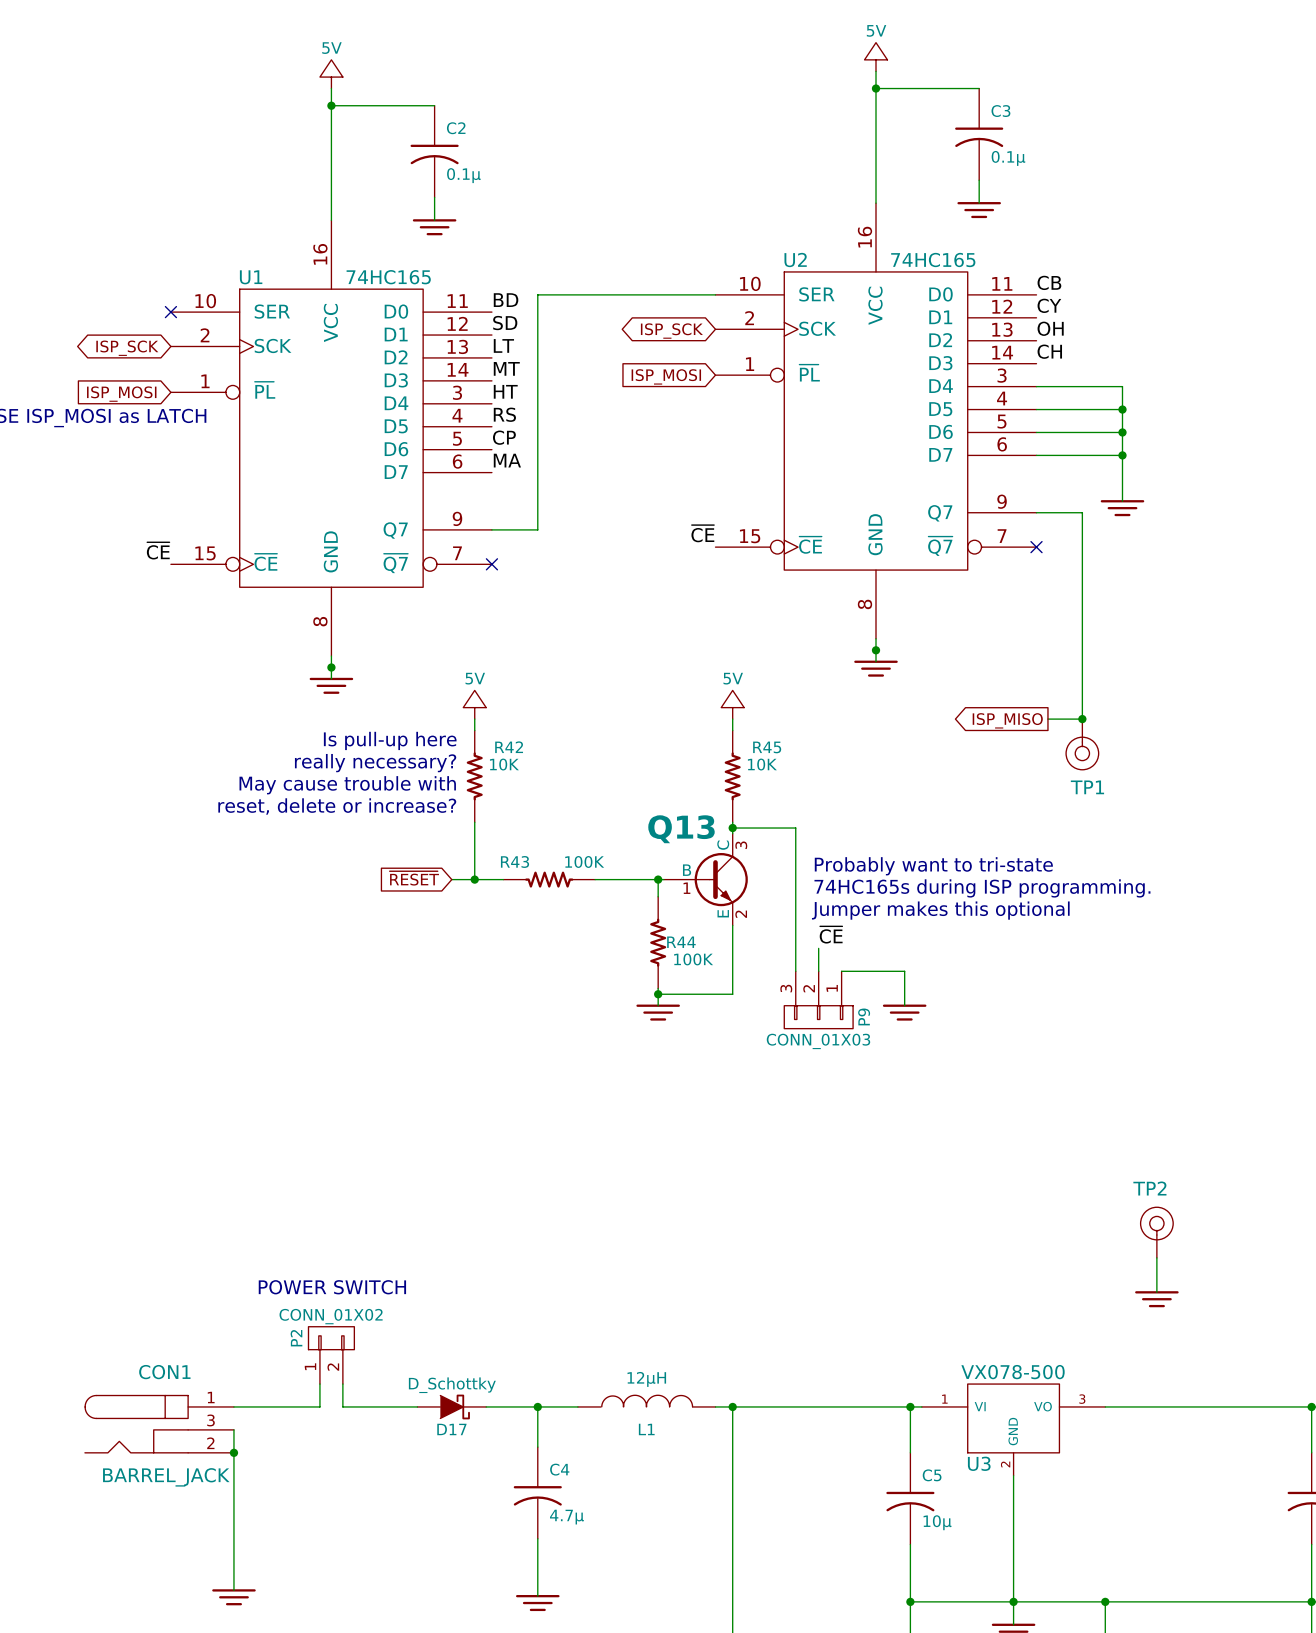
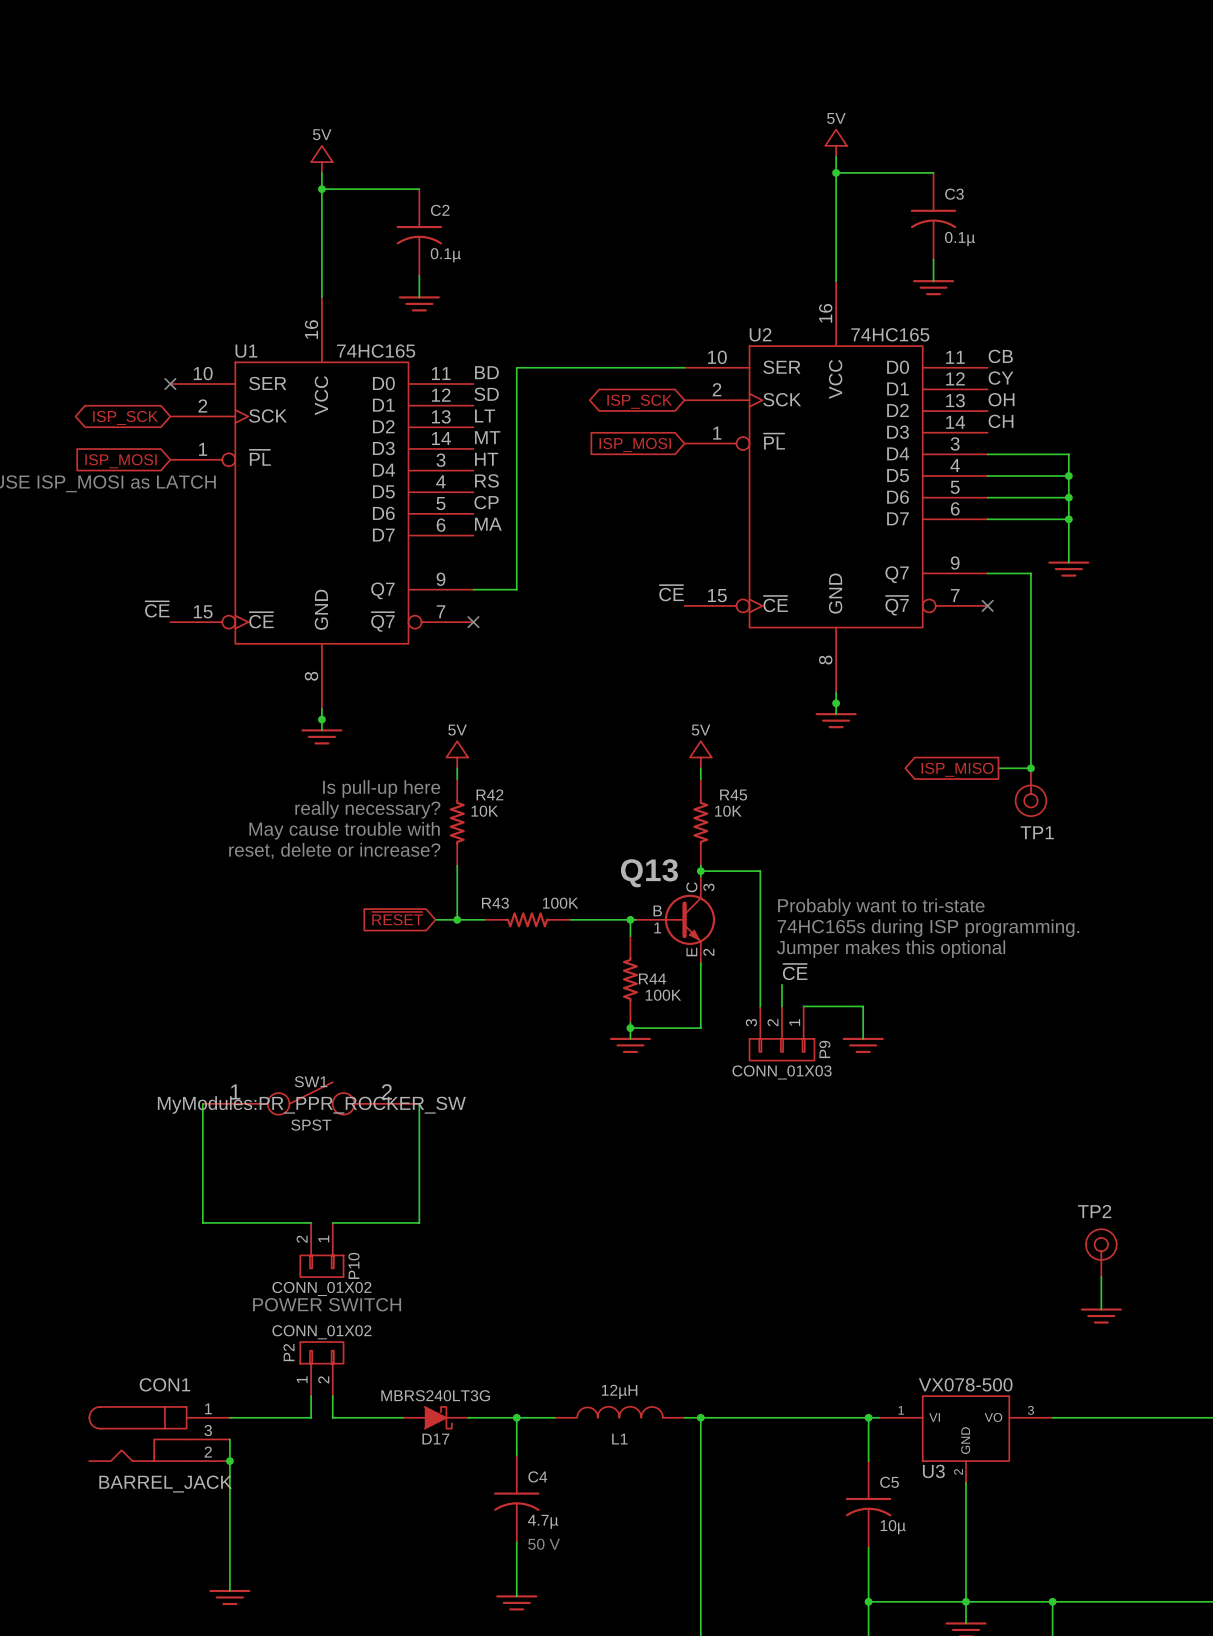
SW1: none -> SPST (311, 1098)
wire: none -> (202, 1103) (202, 1222) (311, 1222)
wire: none -> (419, 1103) (419, 1222) (332, 1222)
P10: none -> CONN_01X02 (321, 1250)
D17 value: D_Schottky (452, 1385) -> MBRS240LT3G (435, 1395)
text: none -> 50 V (544, 1544)

